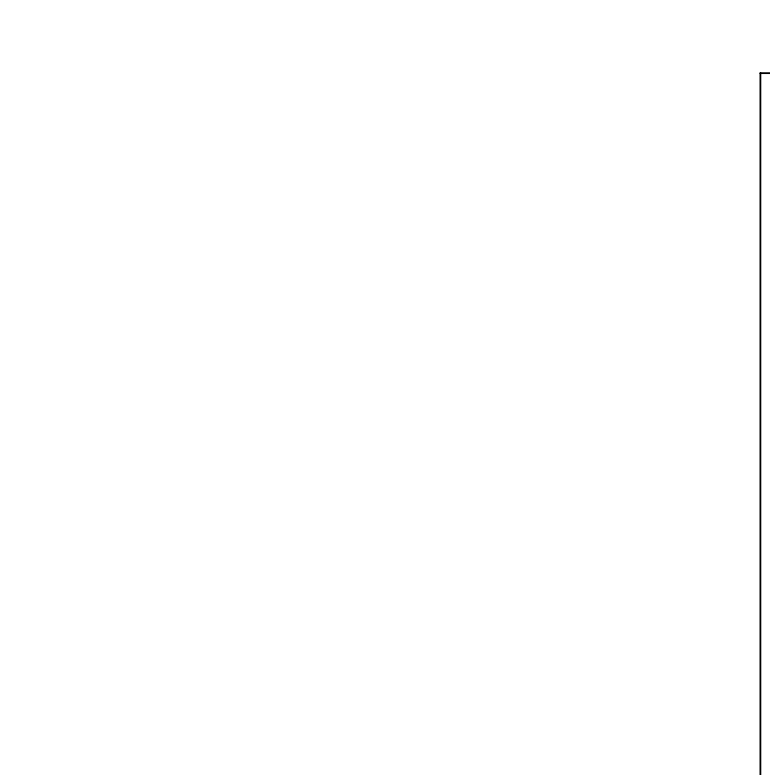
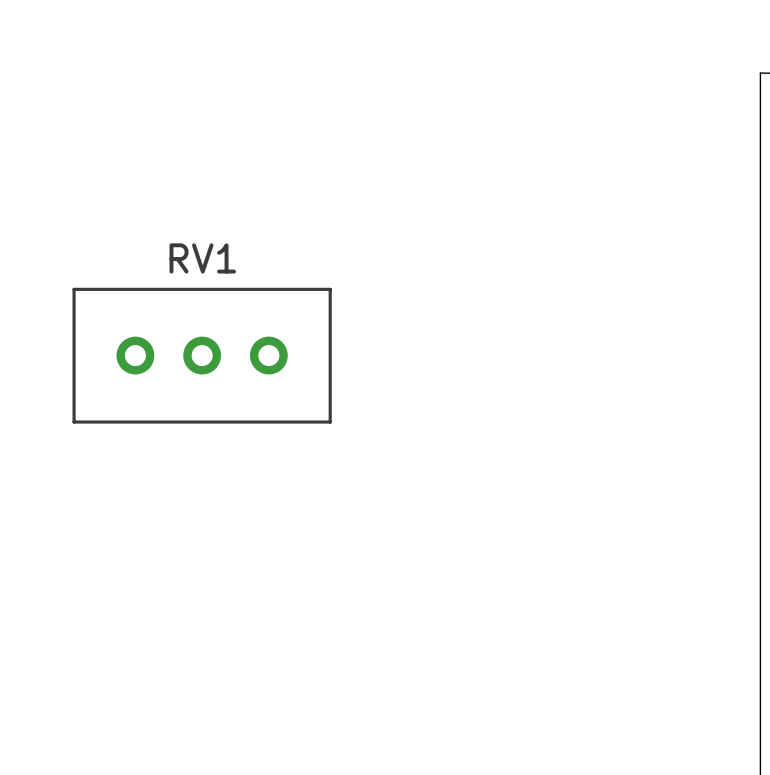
RV1: none -> (202, 355)

